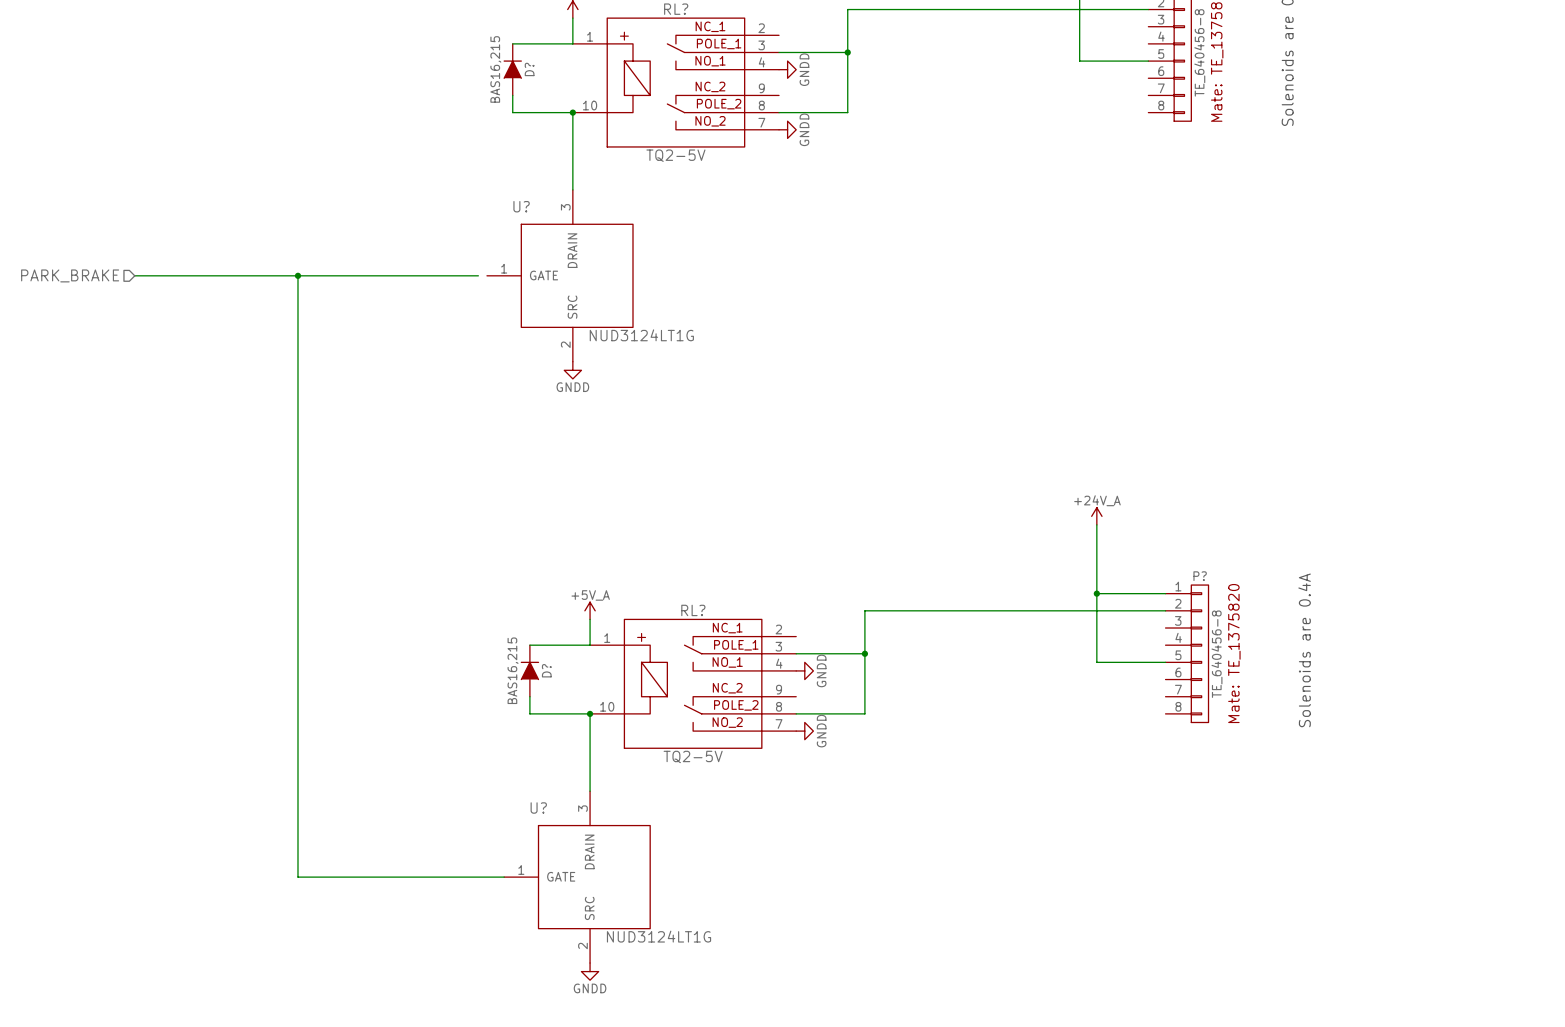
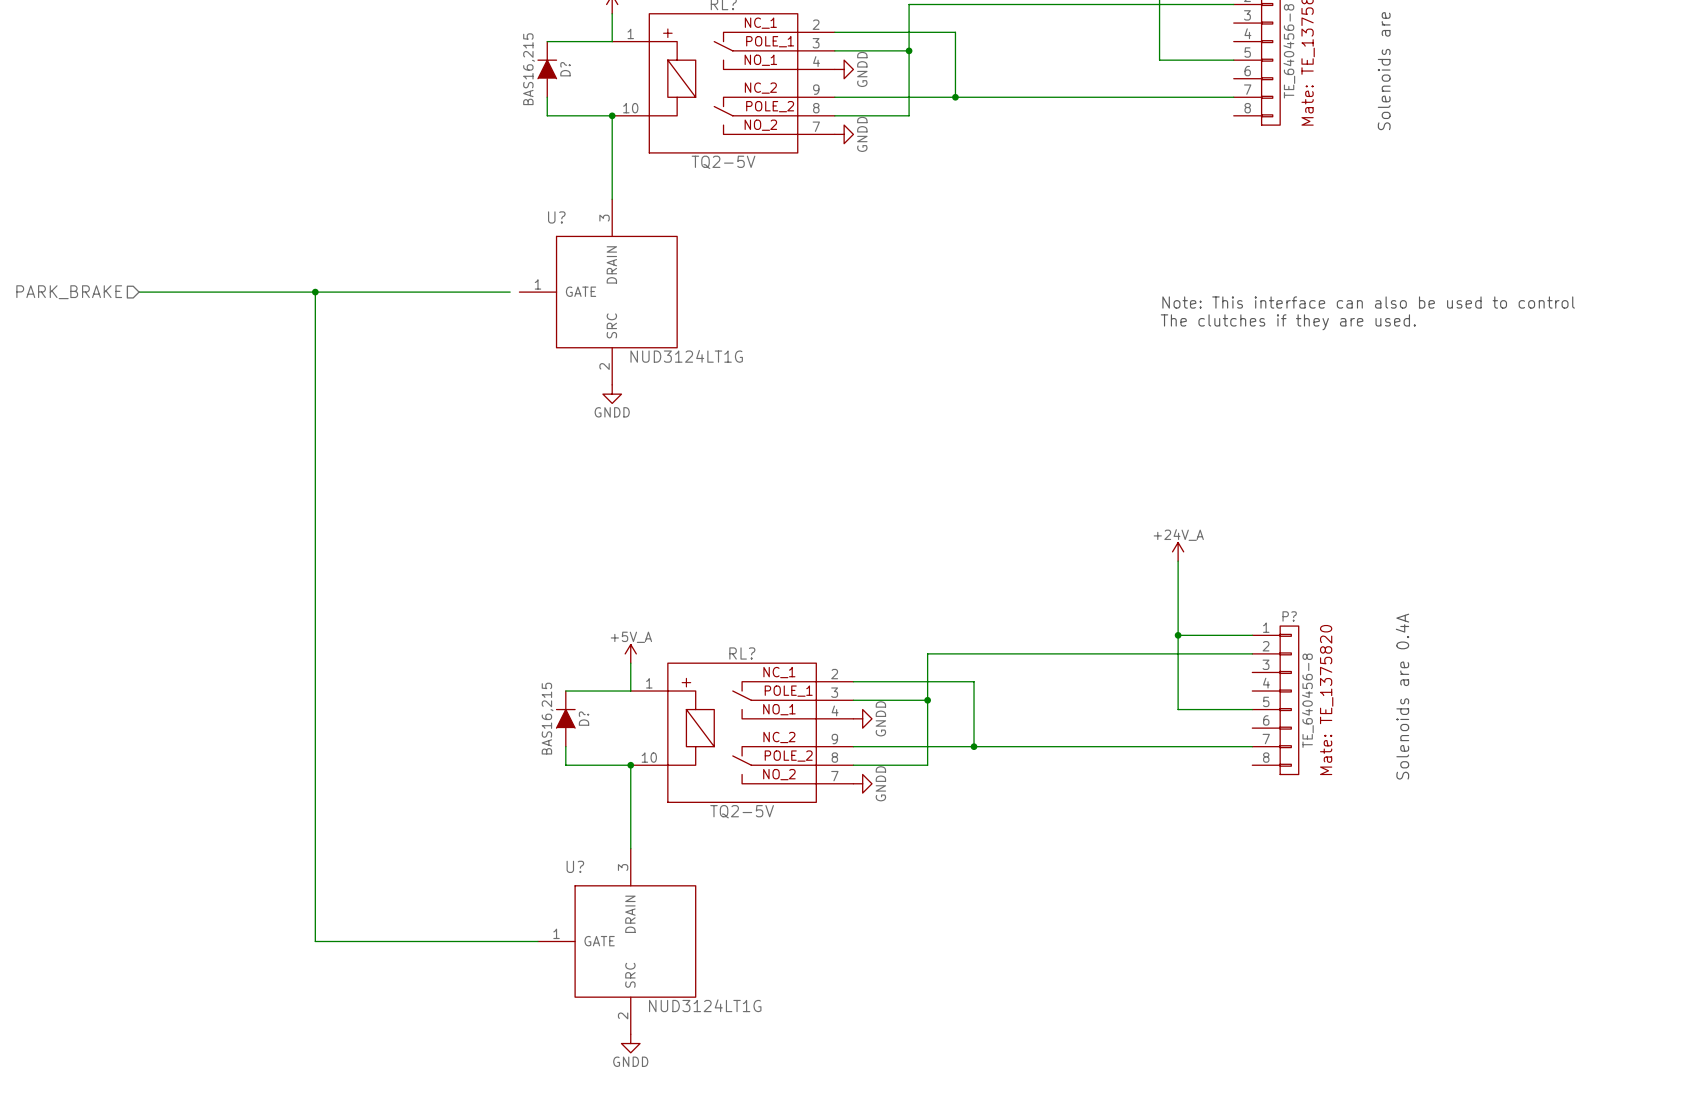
wire: none -> (834, 32) (955, 32) (955, 97)
wire: none -> (834, 97) (1233, 97)
junction: none -> (955, 97)
text: none -> Note: This interface can also be used to control (1368, 302)
text: none -> The clutches if they are used. (1288, 322)
wire: none -> (853, 681) (974, 681) (974, 746)
wire: none -> (853, 746) (1252, 746)
junction: none -> (974, 746)

